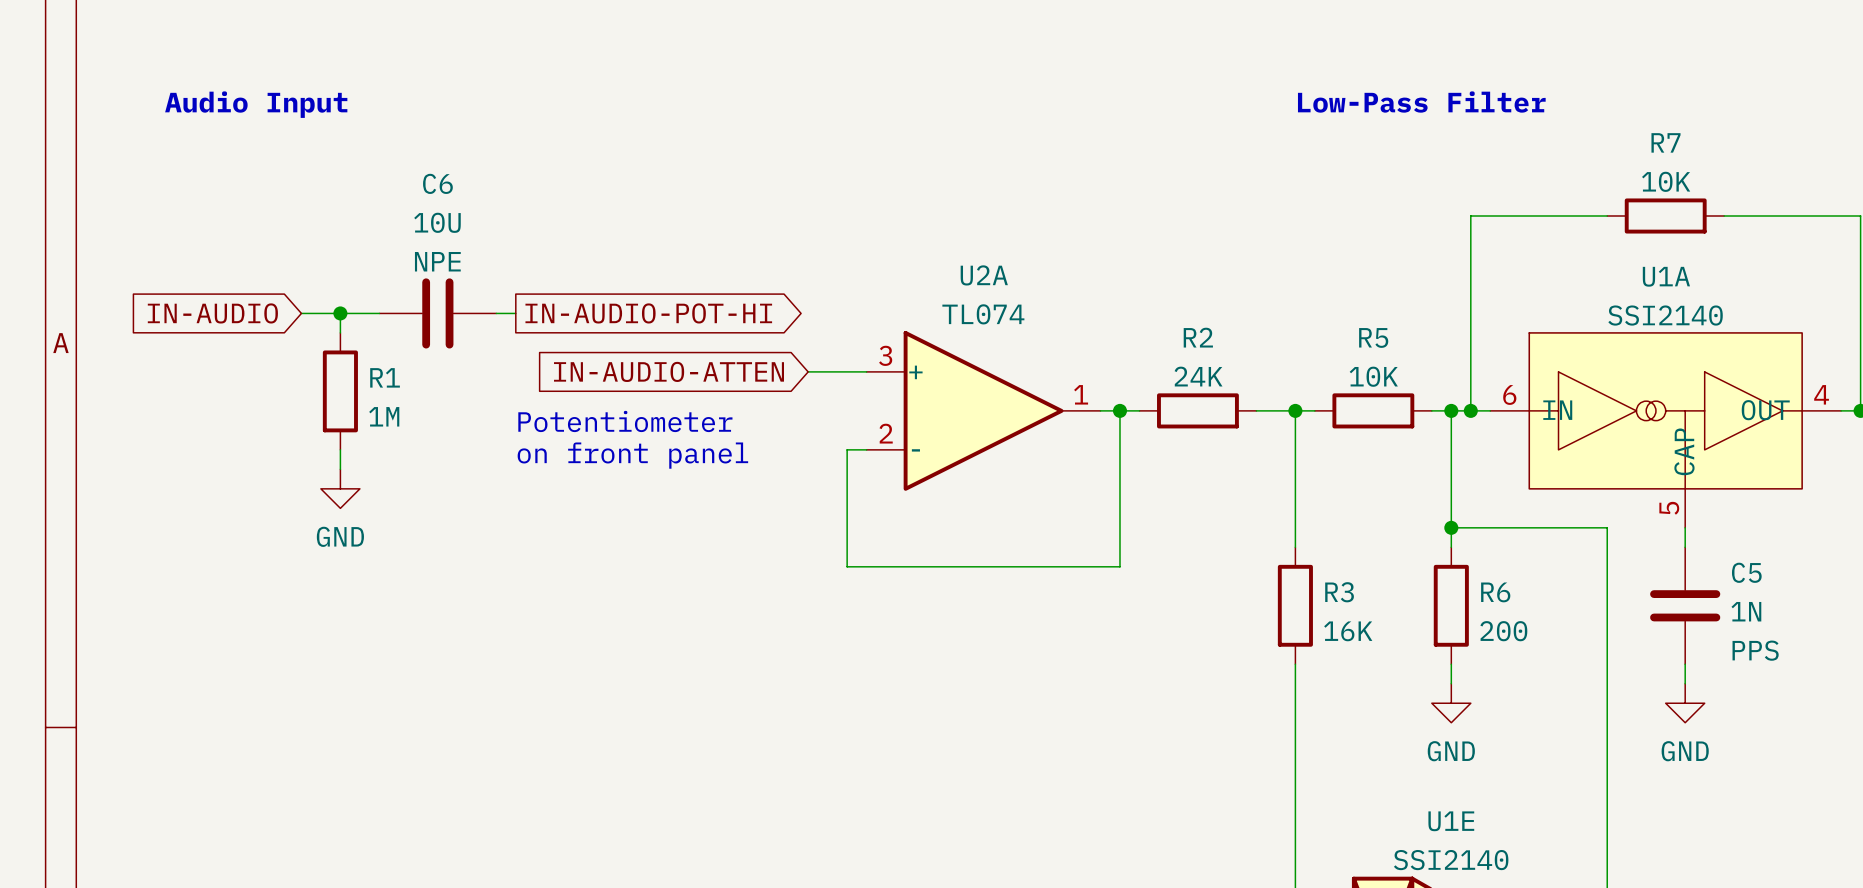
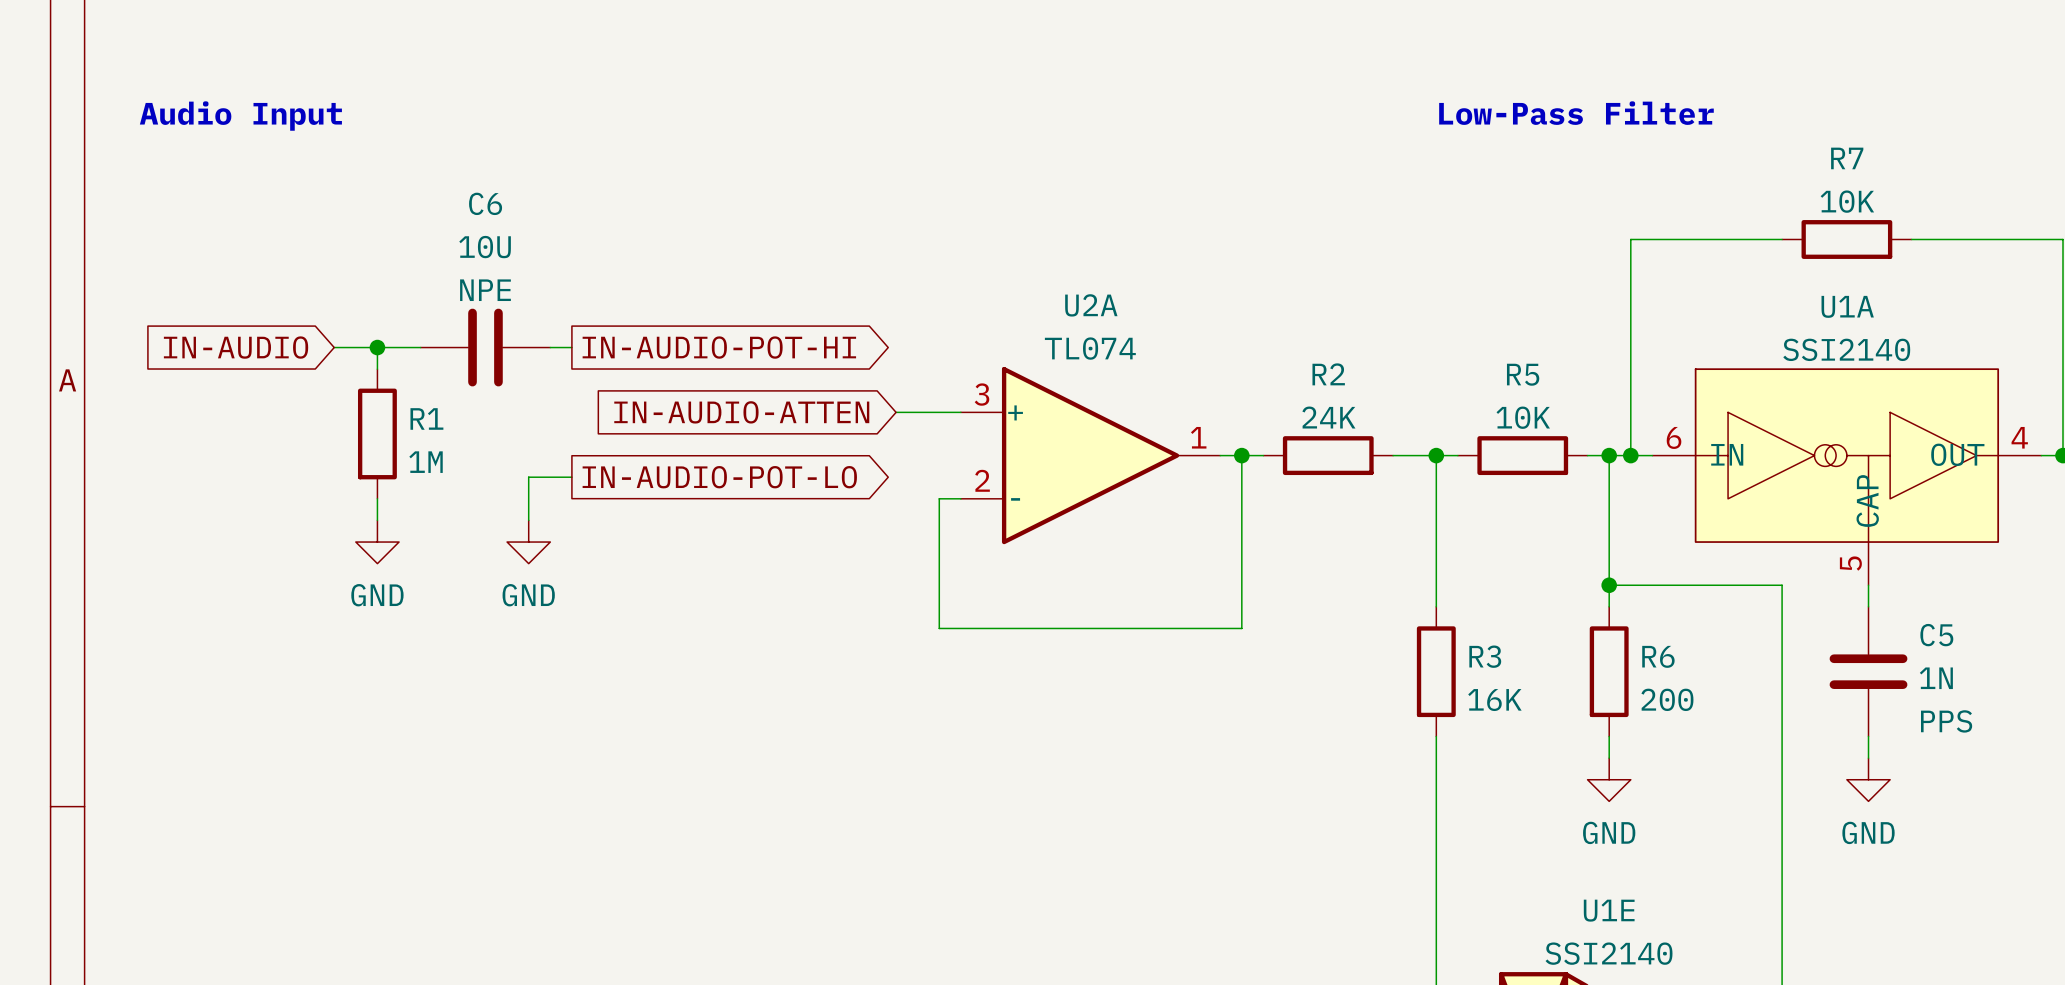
text position: Audio Input (256, 104) -> Audio Input (240, 116)
text: Potentiometer (625, 421) -> none
wire: none -> (571, 477) (528, 477) (528, 520)
global label: none -> IN-AUDIO-POT-LO (719, 477)
text: on front panel (632, 455) -> none
power symbol: none -> GND (528, 542)

